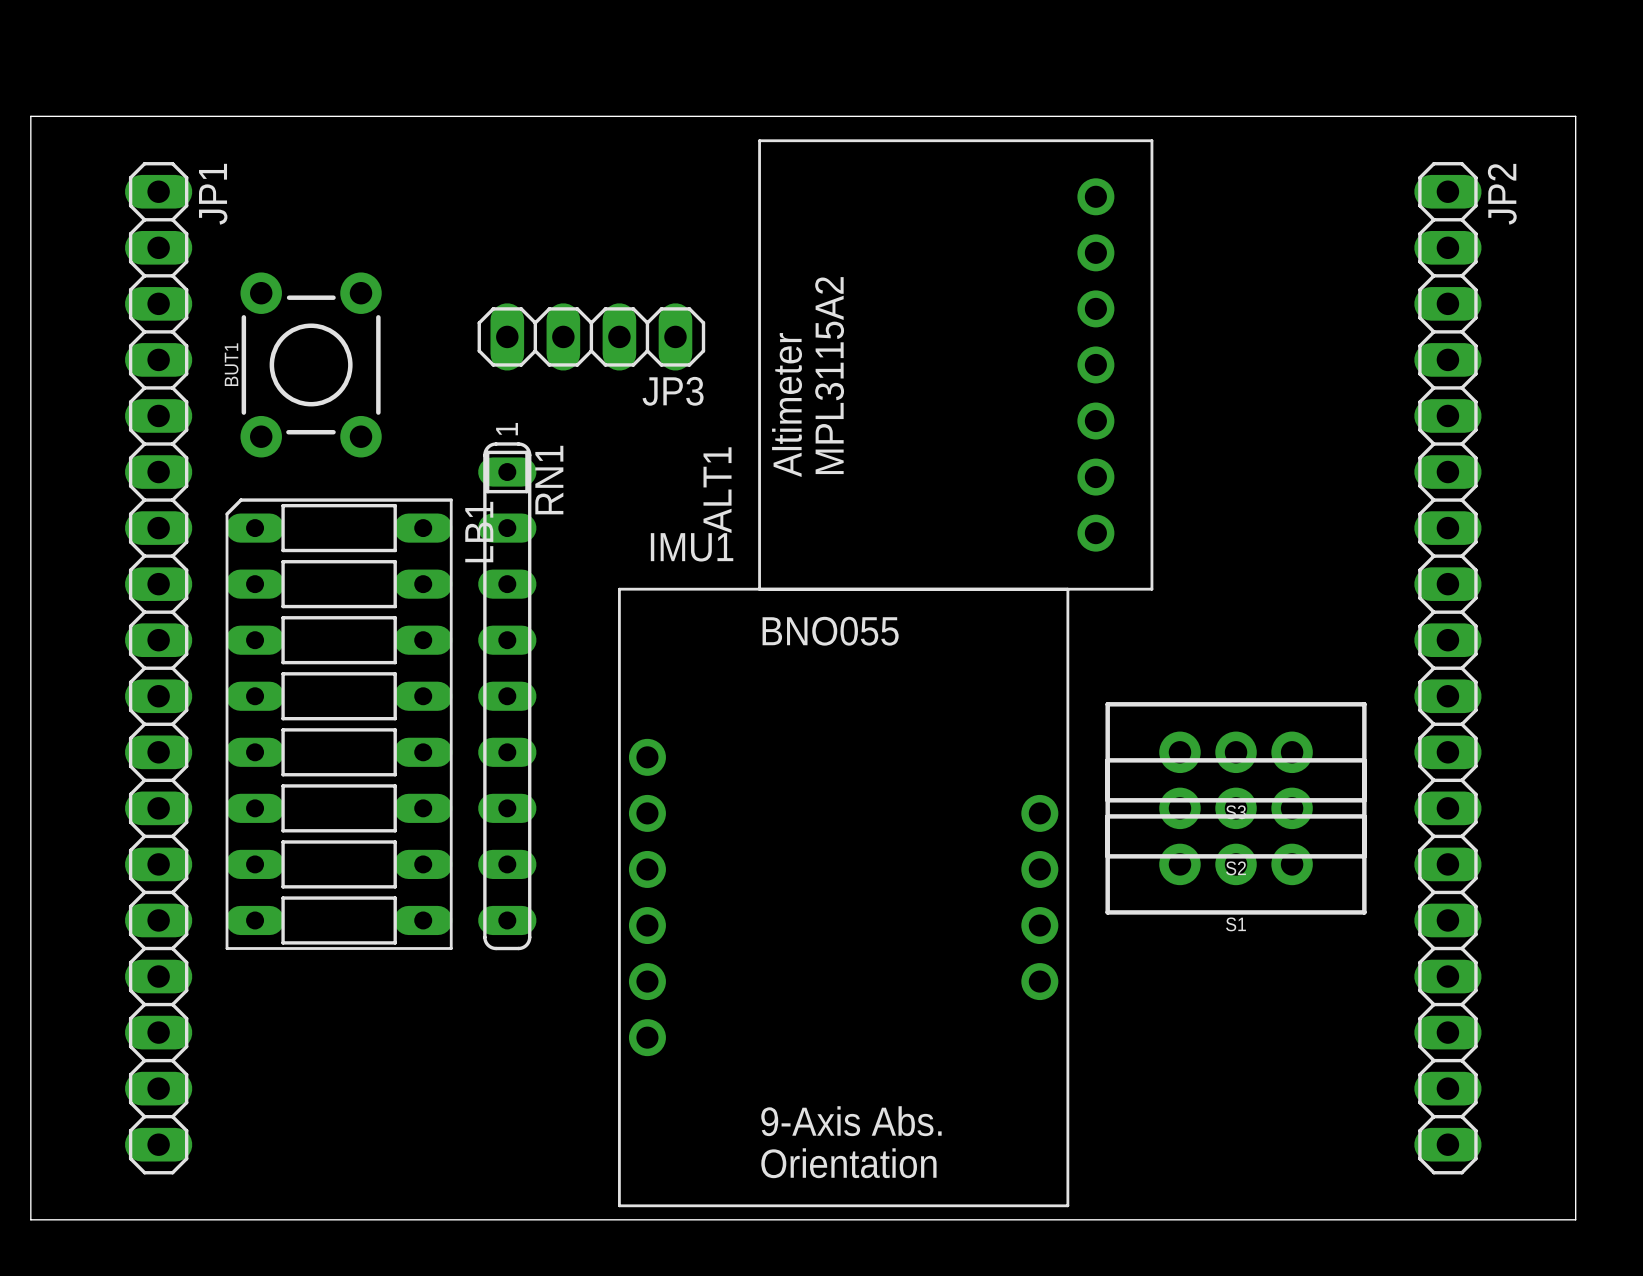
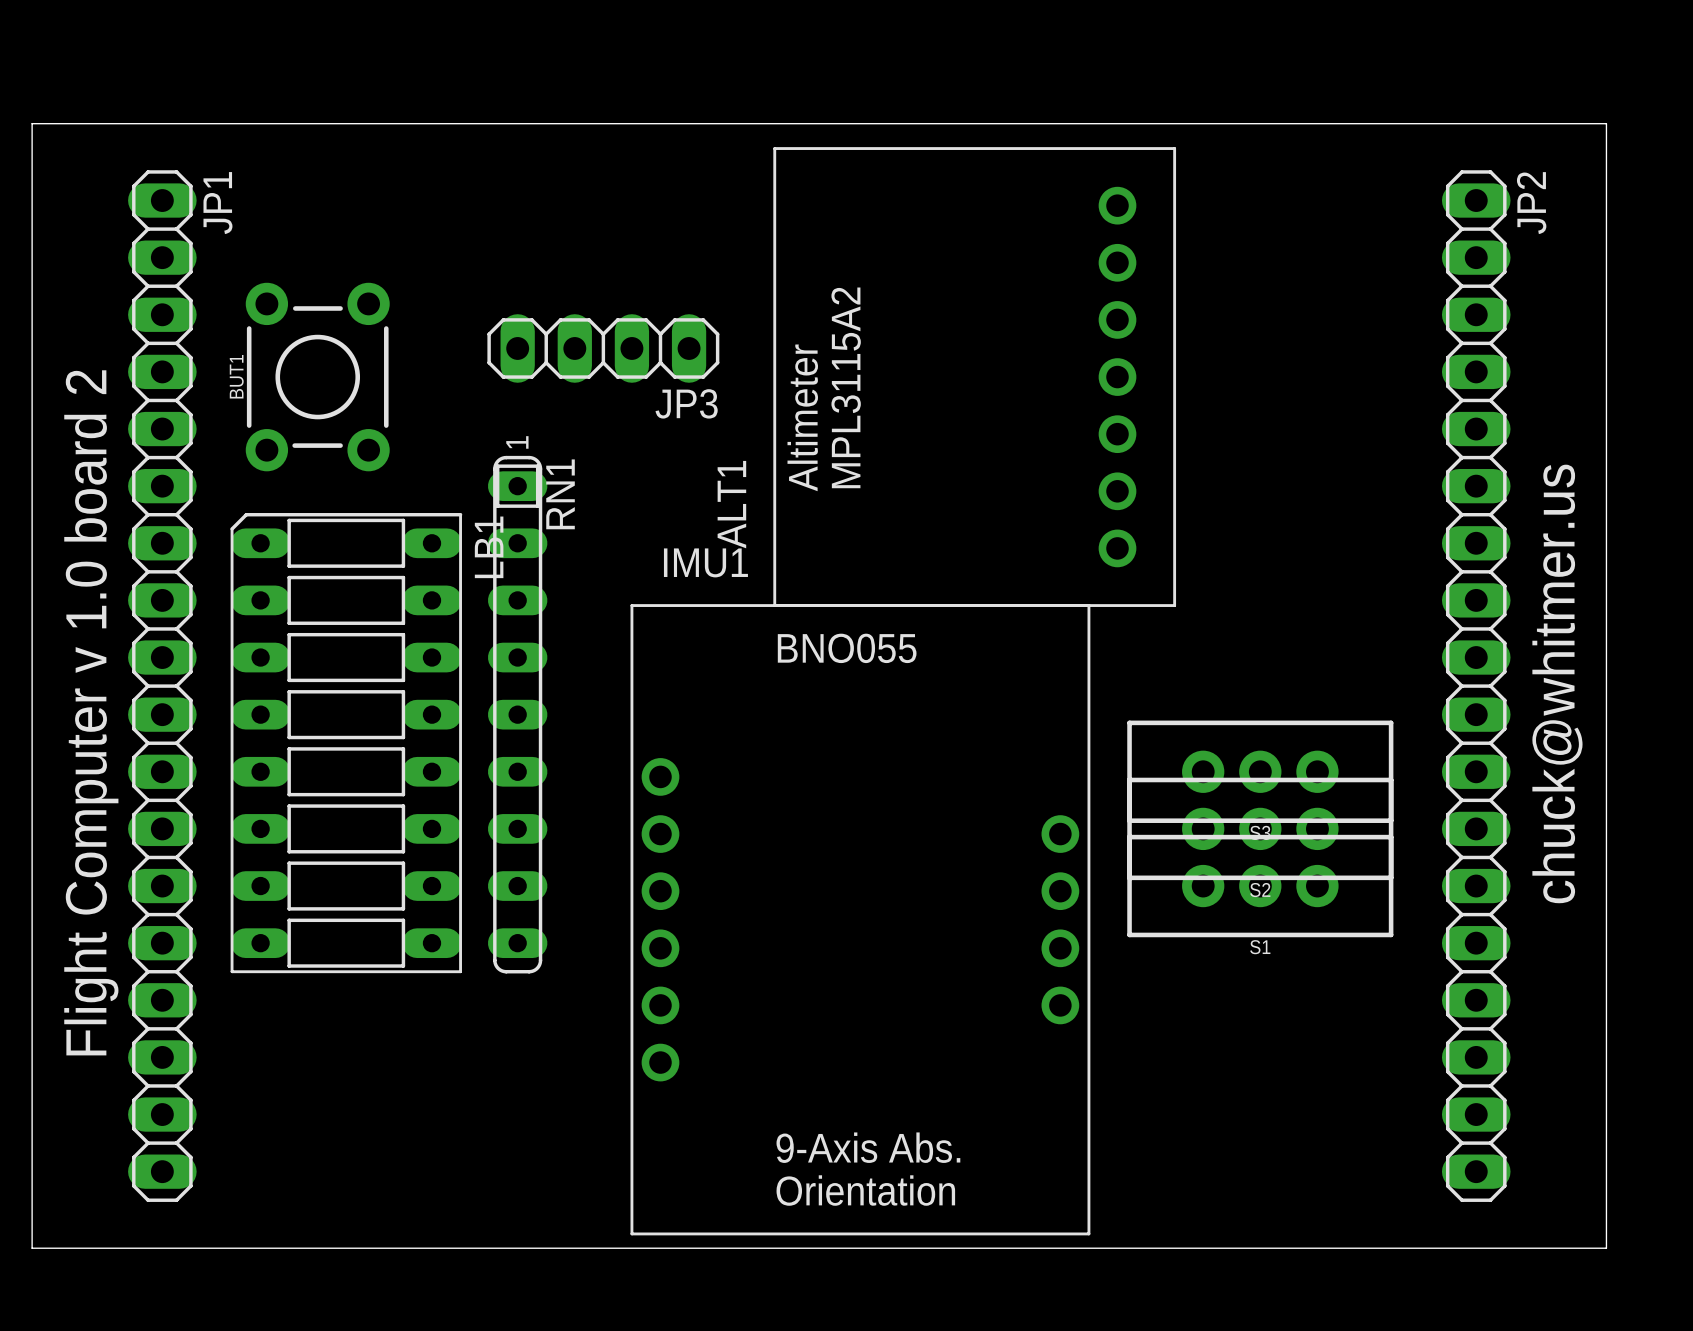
text: none -> chuck@whitmer.us (1557, 683)
text: none -> Flight Computer v 1.0 board 2 (91, 712)

